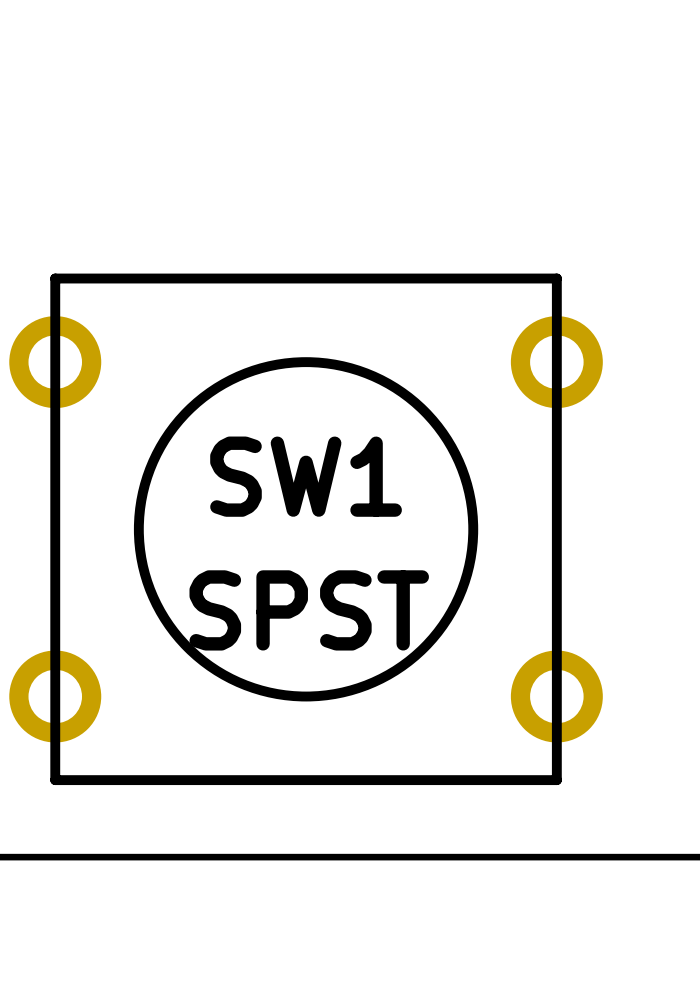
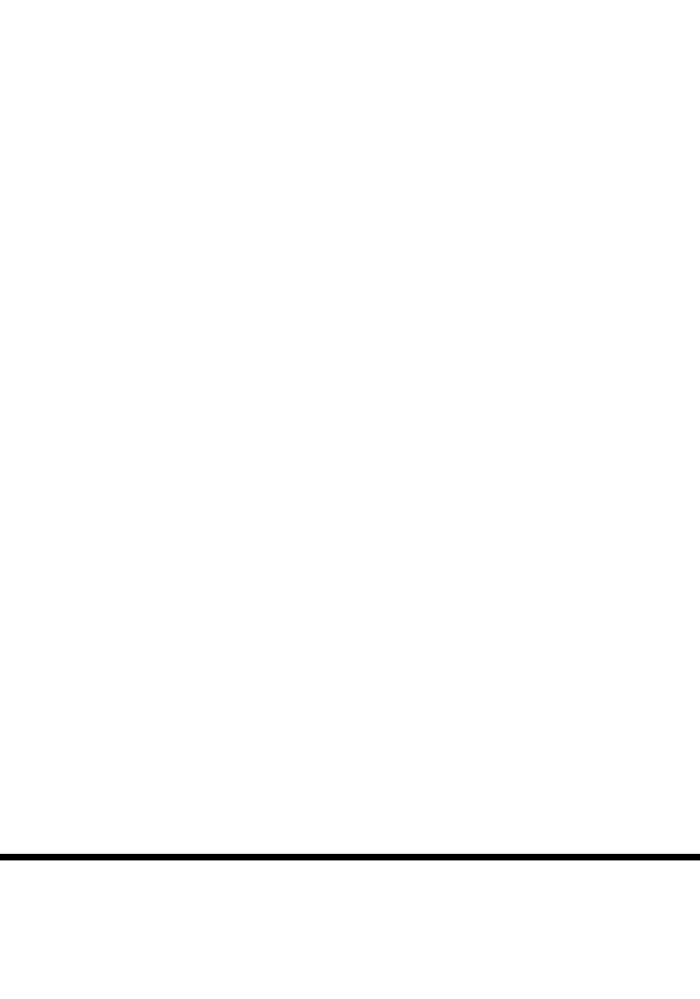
SW1: SPST (306, 529) -> none

